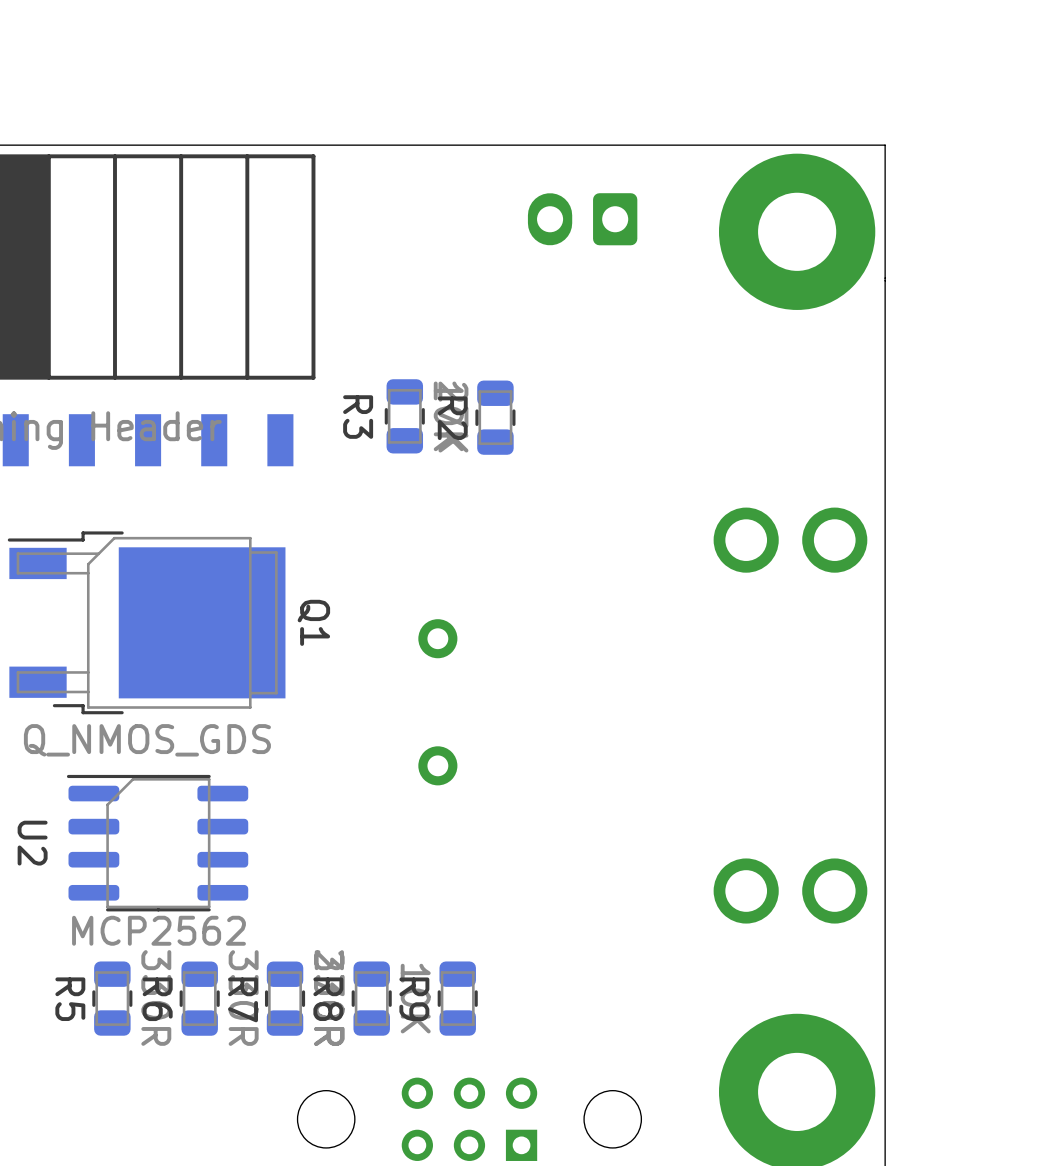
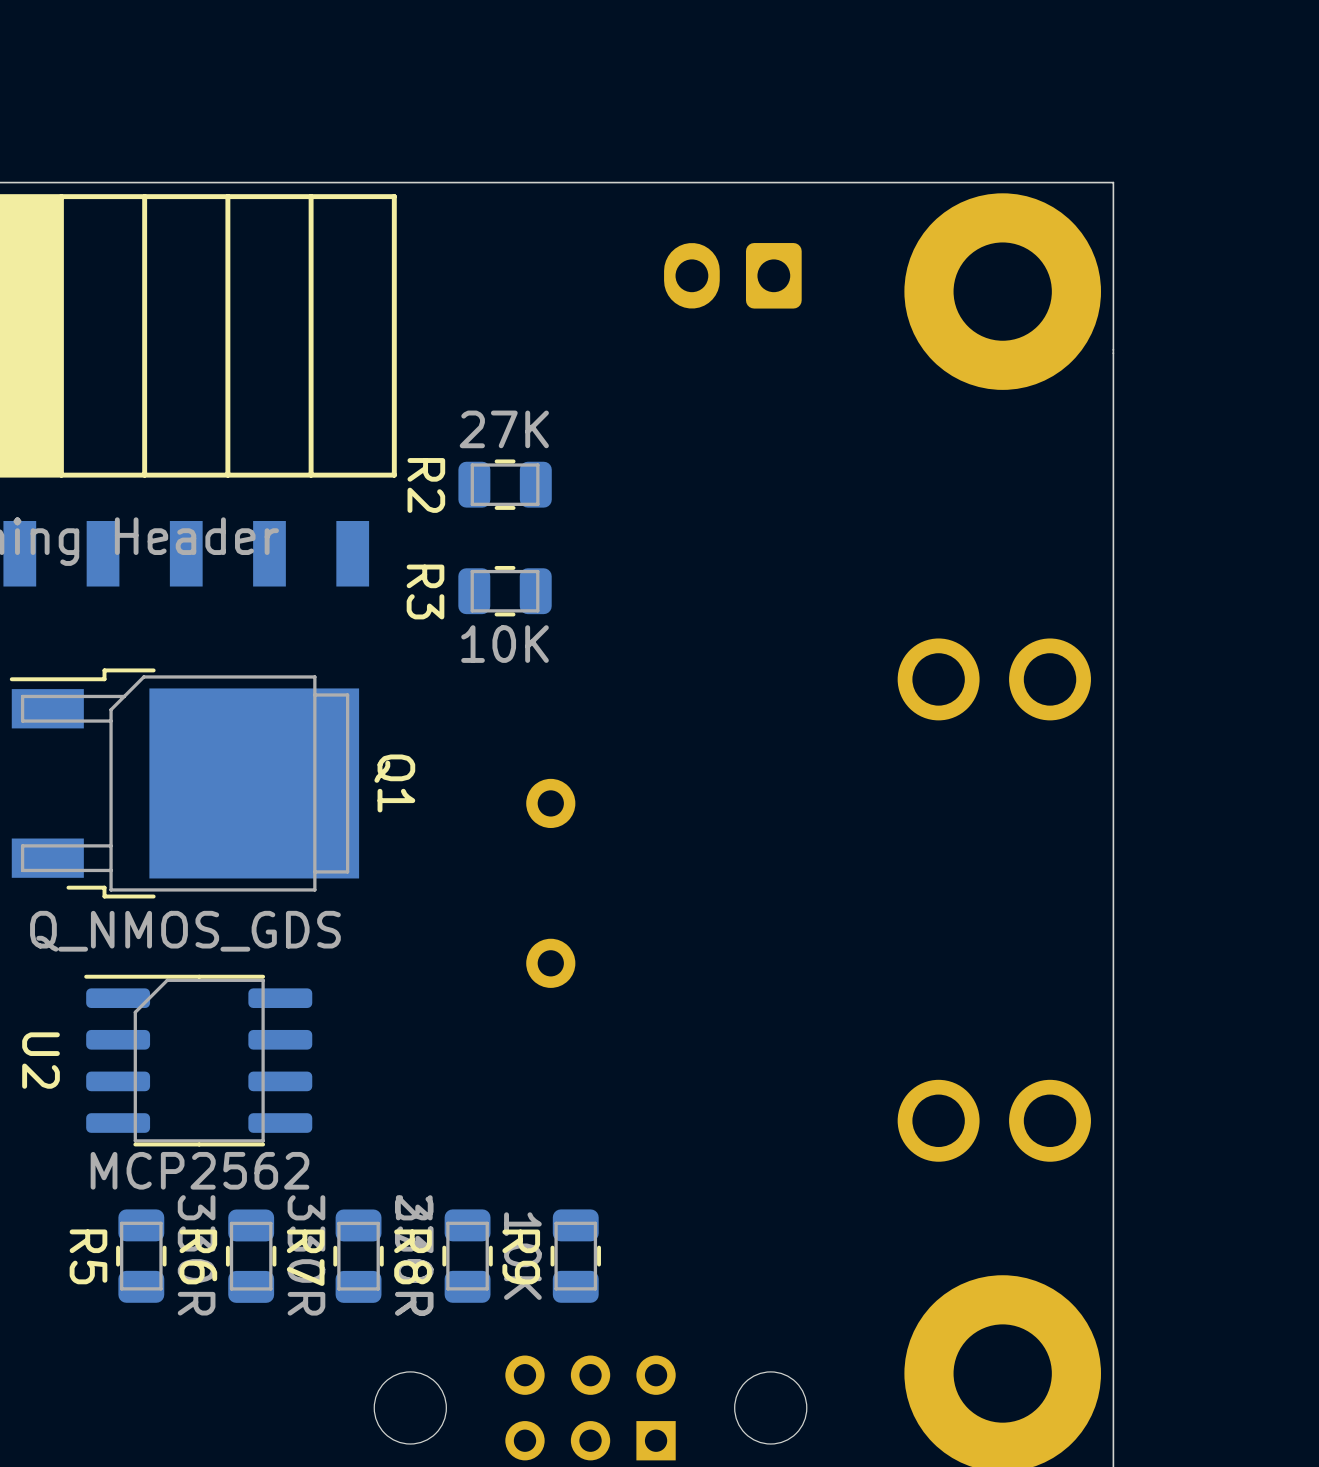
R3 rotation: 0° (404, 416) -> 90° clockwise (505, 591)
R3 position: (404, 416) -> (505, 591)
R2 rotation: 0° (495, 417) -> 90° clockwise (505, 484)
R2 position: (495, 417) -> (505, 484)

